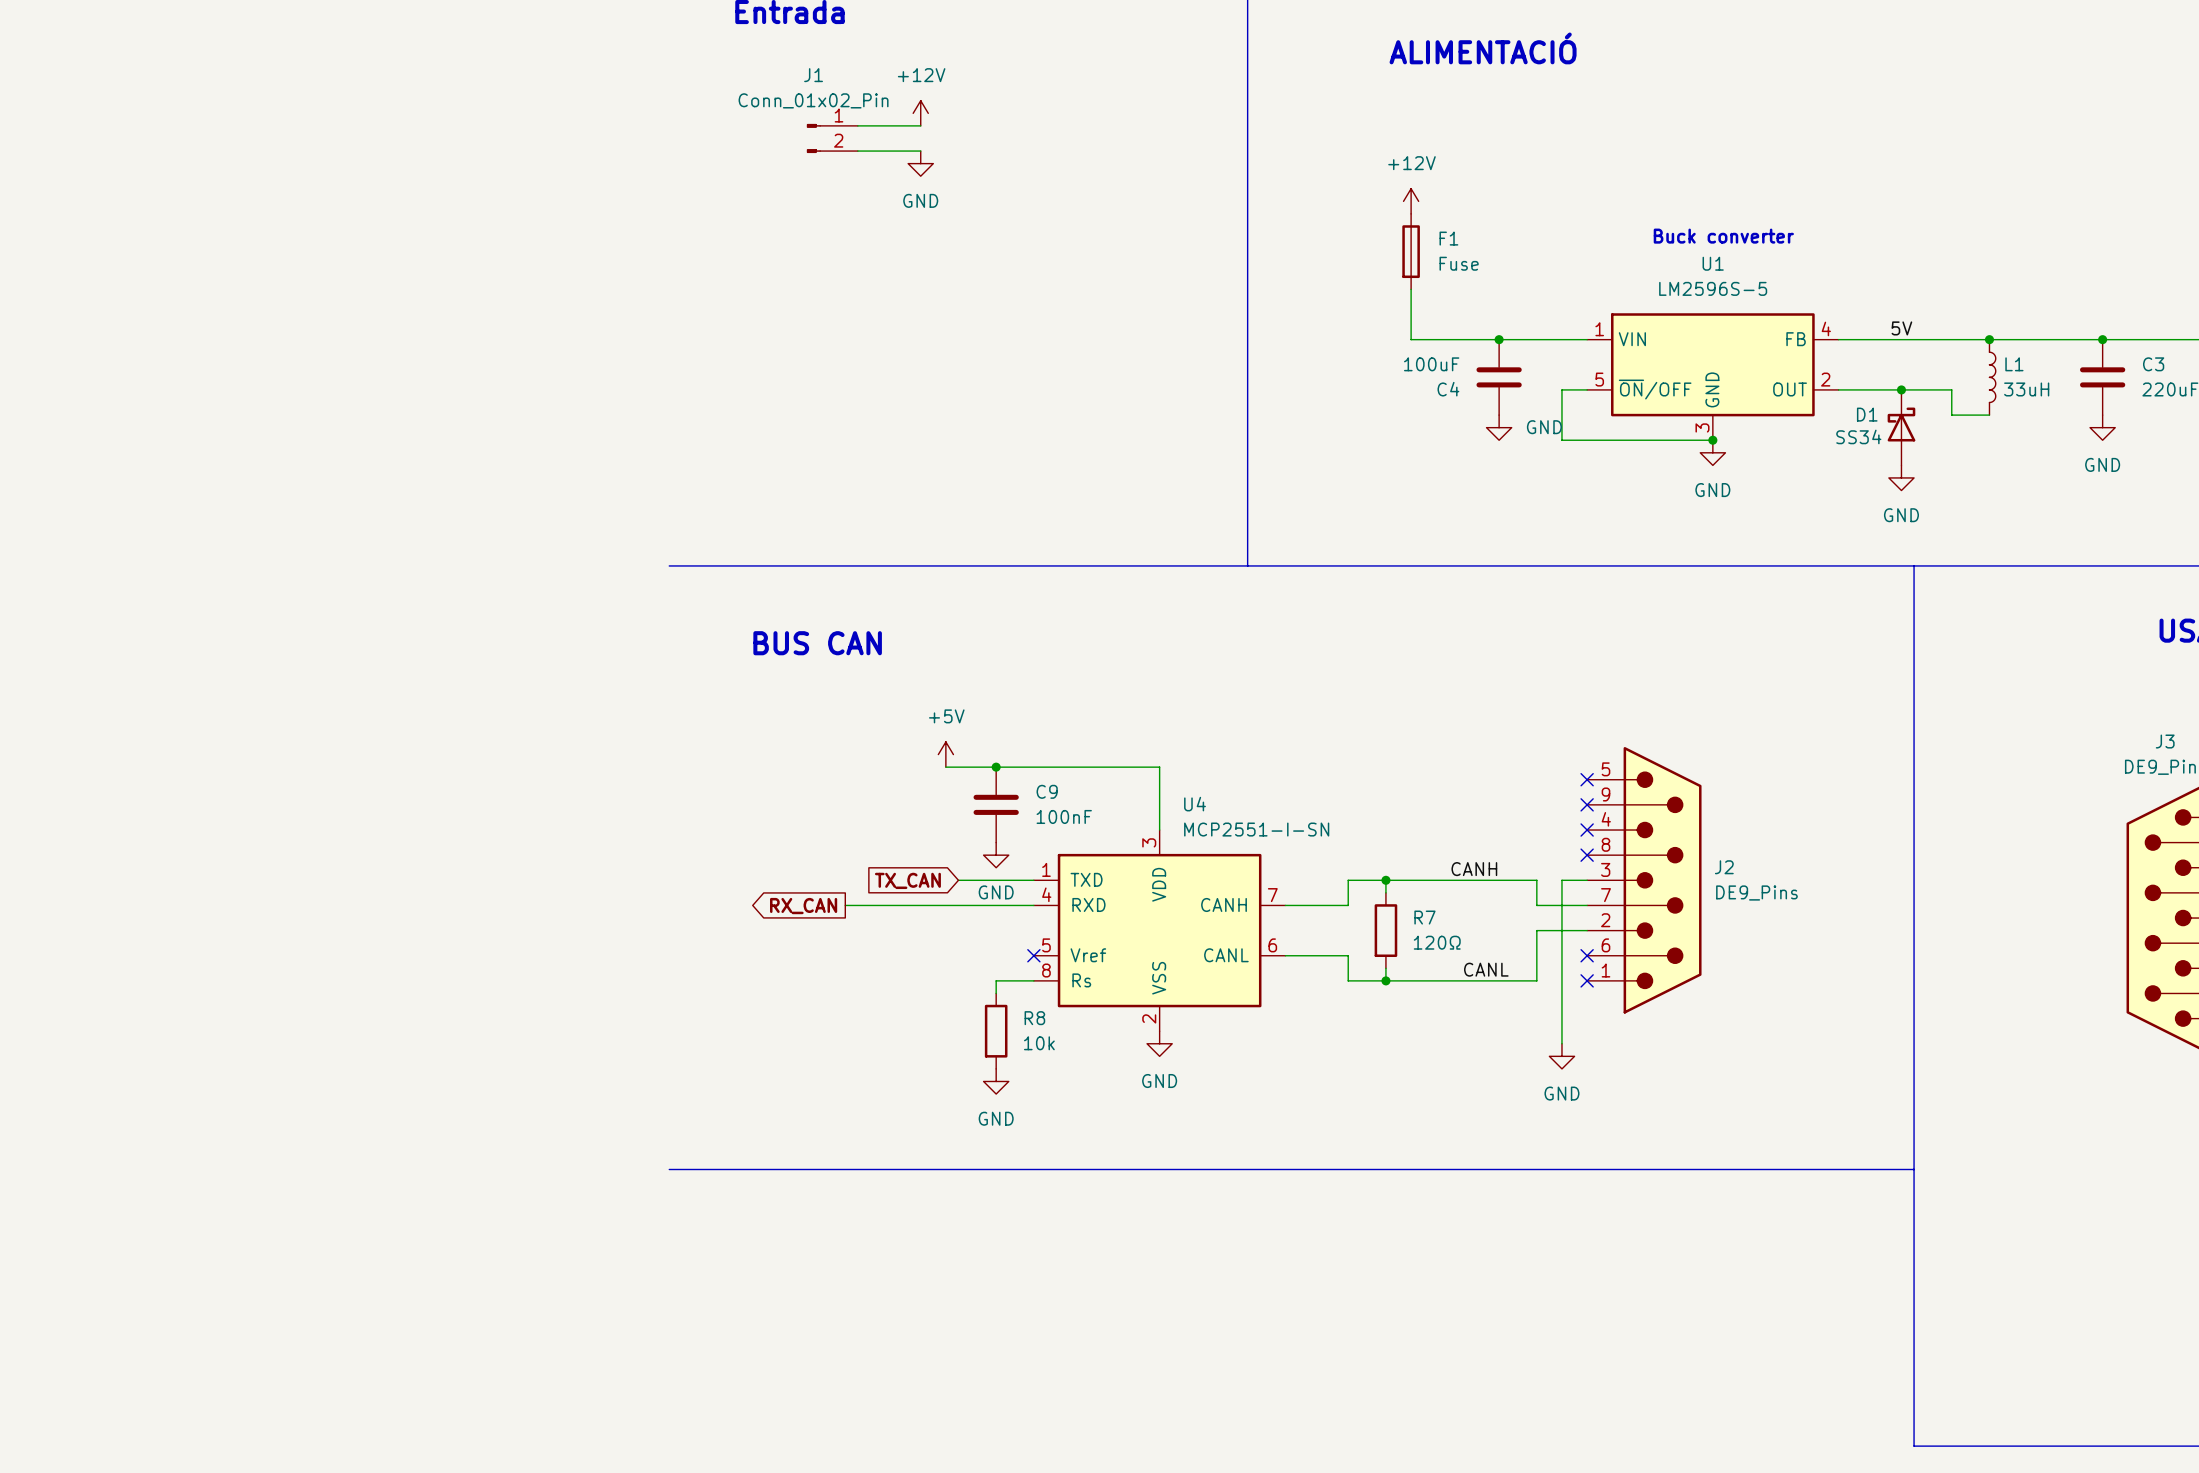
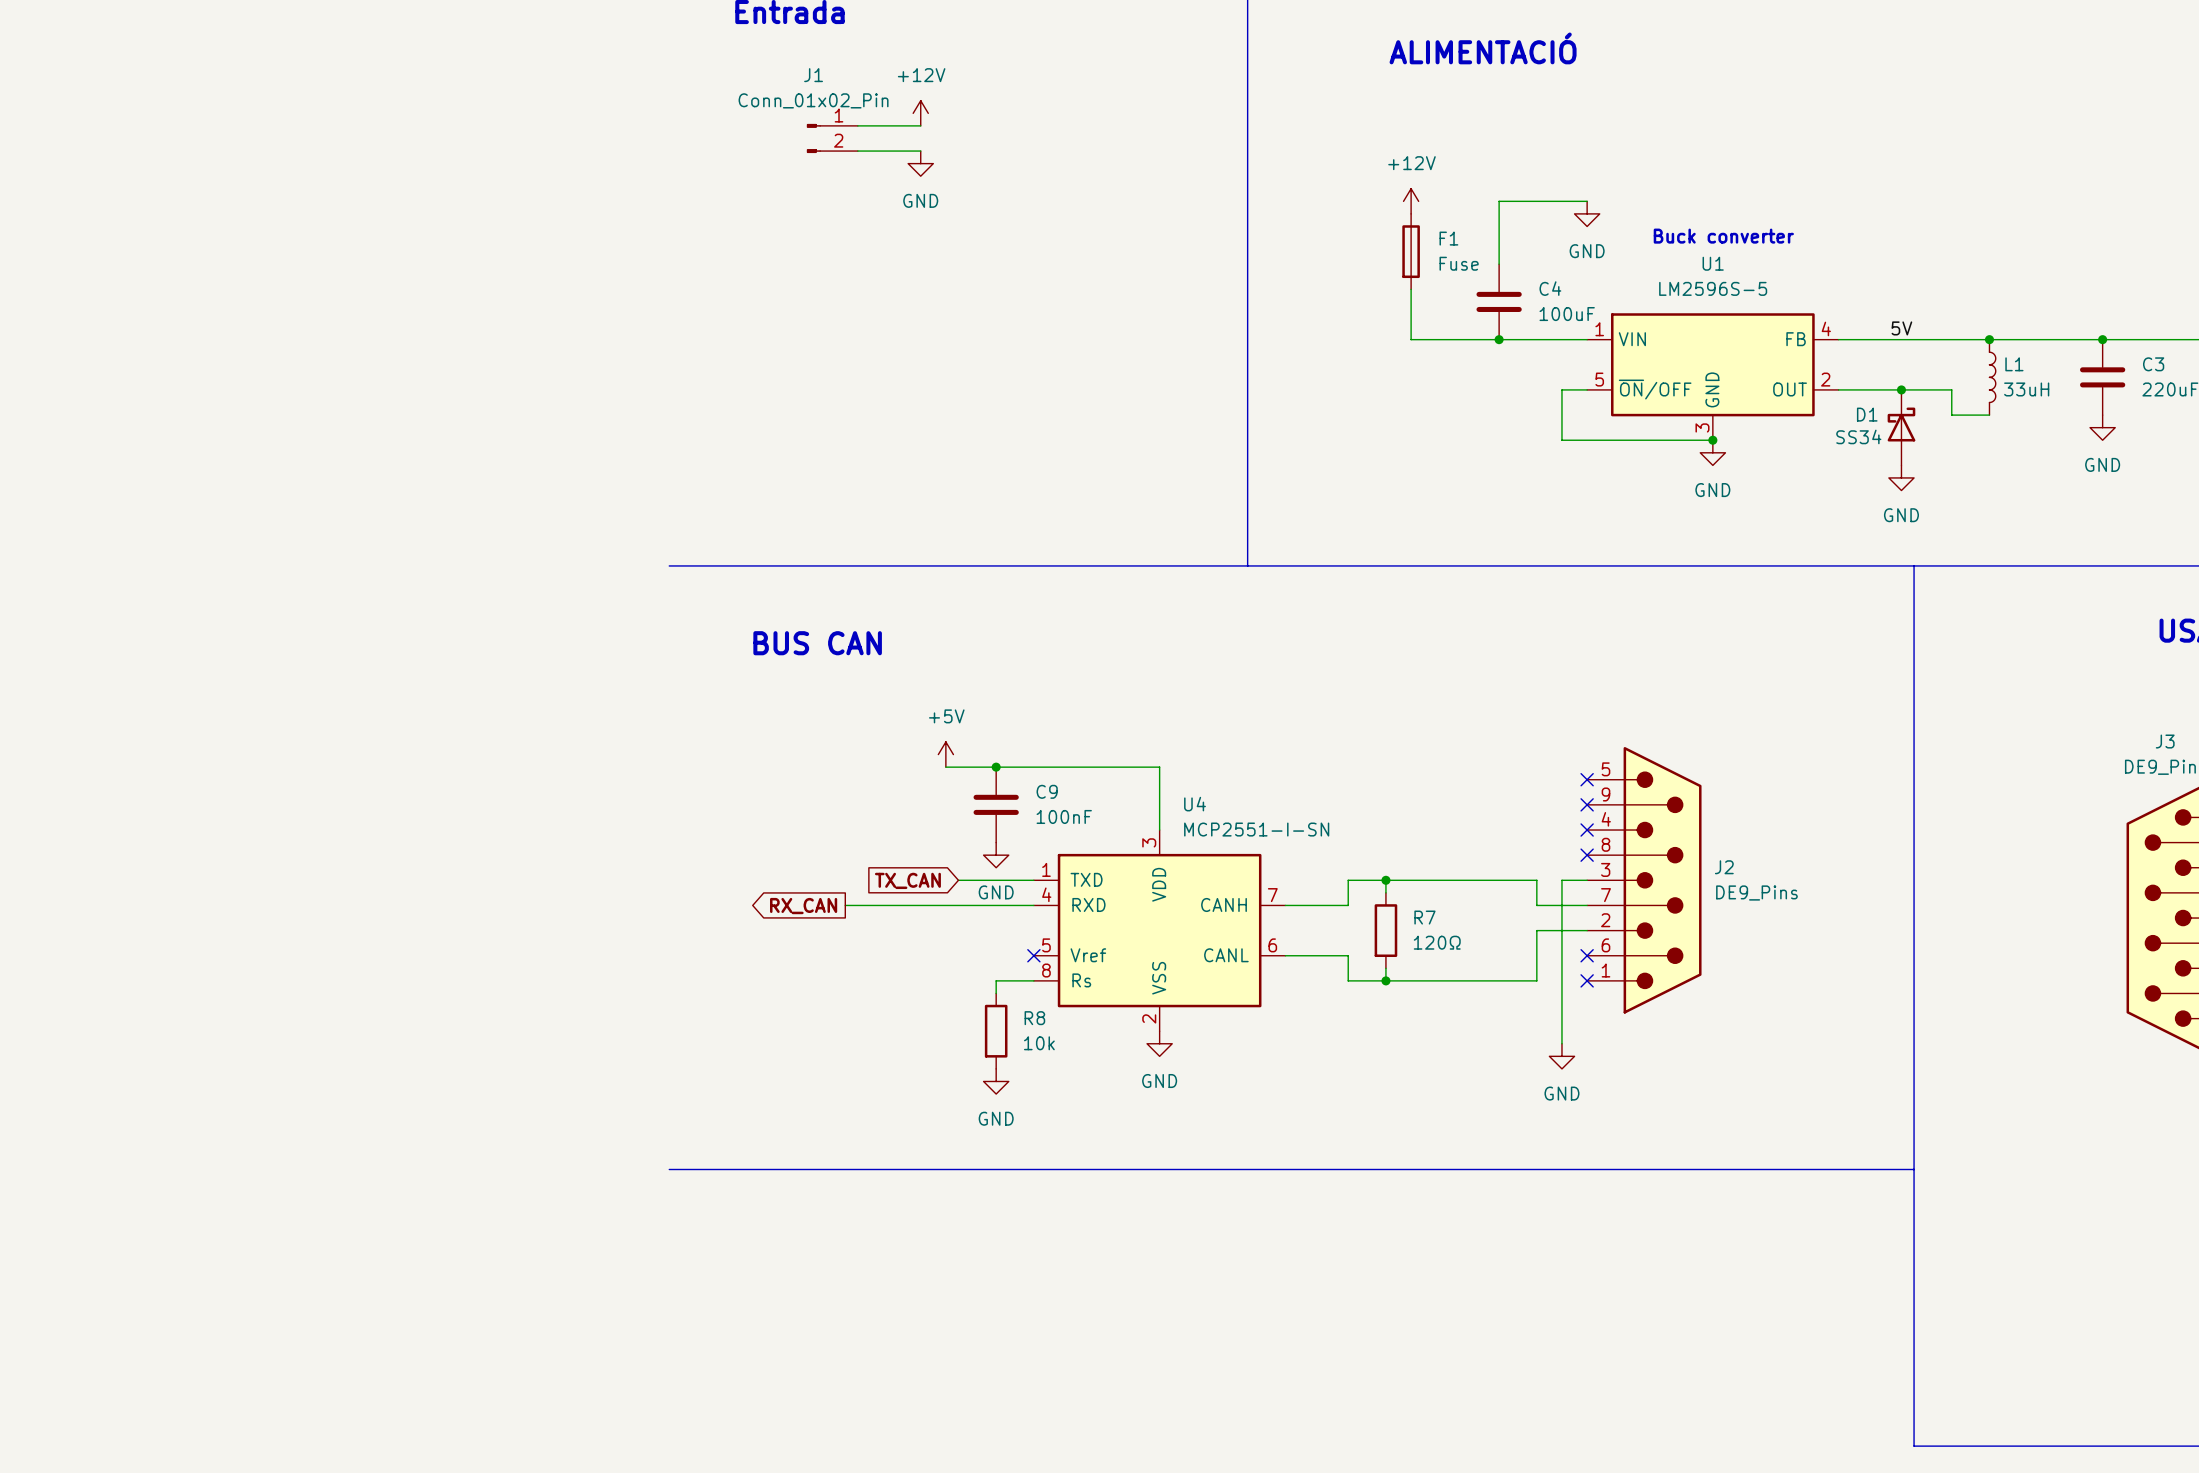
wire: none -> (1587, 201) (1499, 201) (1499, 264)
C4 value position: 100uF (1431, 364) -> 100uF (1567, 314)
C4 position: (1499, 377) -> (1499, 301)
C4 name position: C4 (1448, 389) -> C4 (1550, 288)
power symbol position: GND (1499, 427) -> GND (1587, 213)
power symbol text position: GND (1544, 427) -> GND (1587, 251)
label: CANH (1474, 869) -> none
label: CANL (1486, 969) -> none

